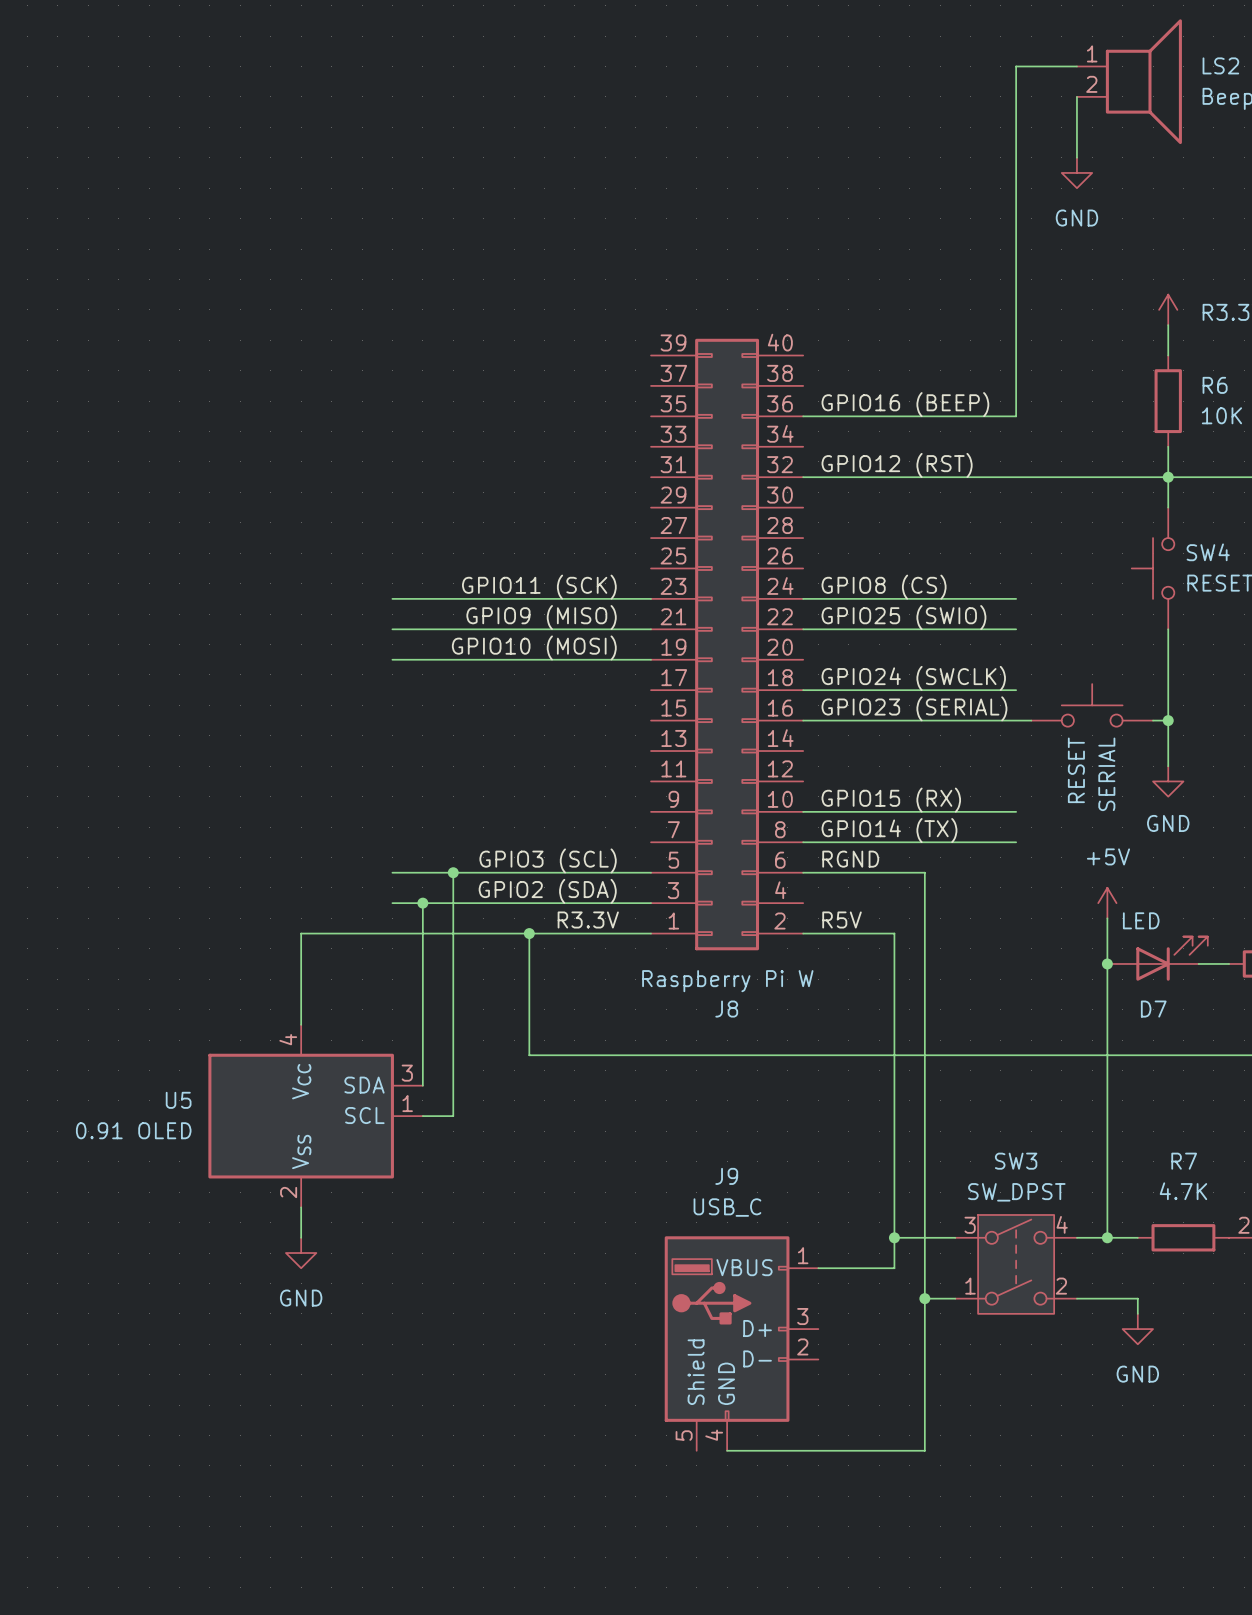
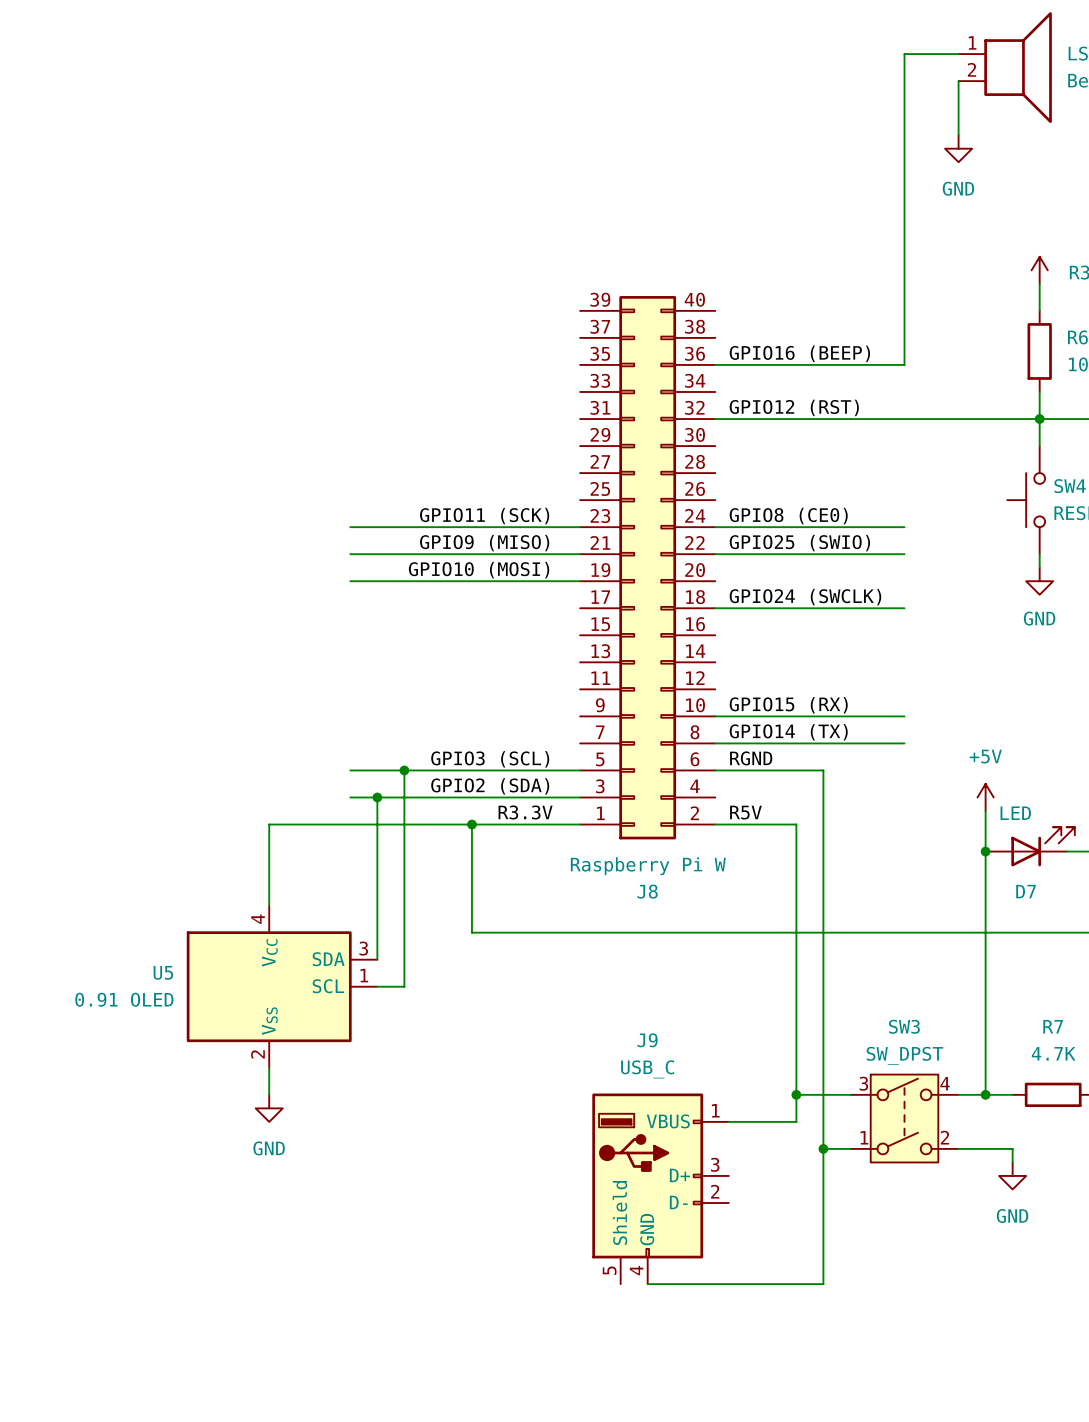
label: GPIO8 (CS) (884, 587) -> GPIO8 (CE0) (788, 516)
wire: (1168, 644) (1168, 766) -> none
SERIAL: RESET (1092, 705) -> none
label: GPIO23 (SERIAL) (914, 708) -> none
wire: (803, 720) (1031, 720) -> none
wire: (1153, 720) (1168, 720) -> none
junction: (1168, 720) -> none
power symbol position: GND (1168, 781) -> GND (1039, 581)

